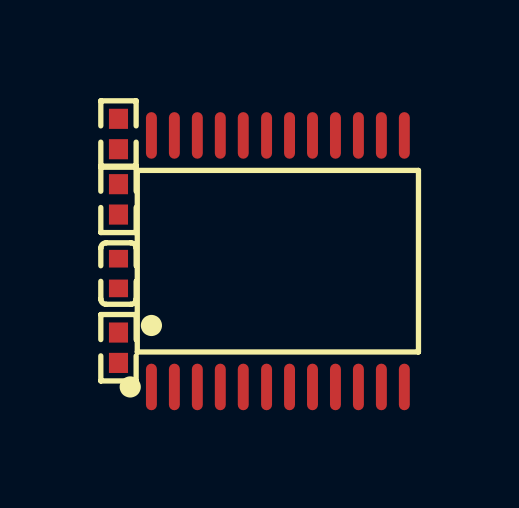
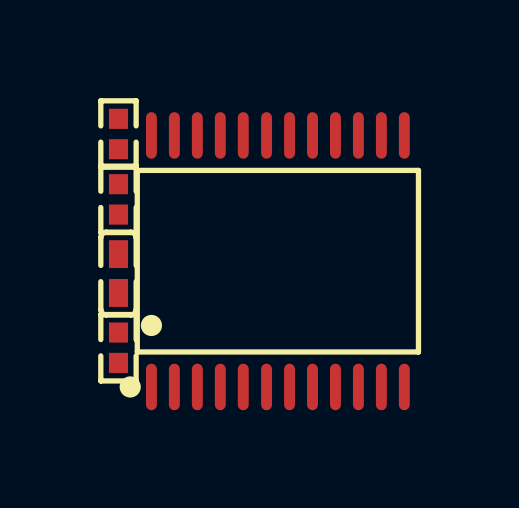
part footprint: [98, 240, 139, 307] -> [98, 229, 139, 318]

